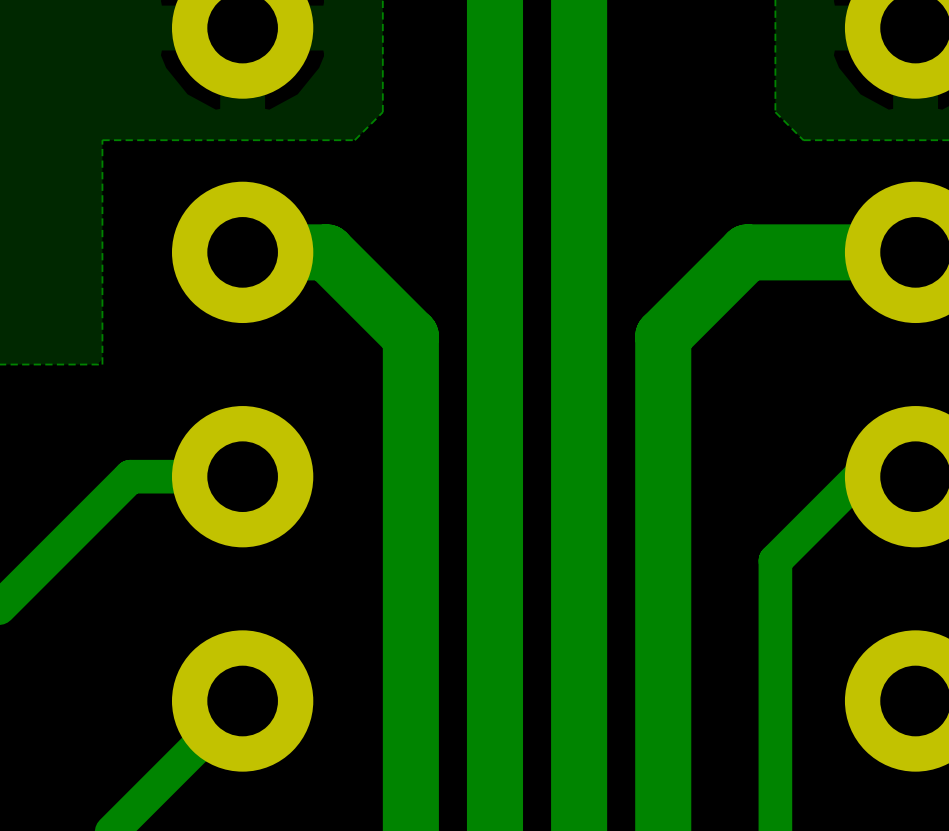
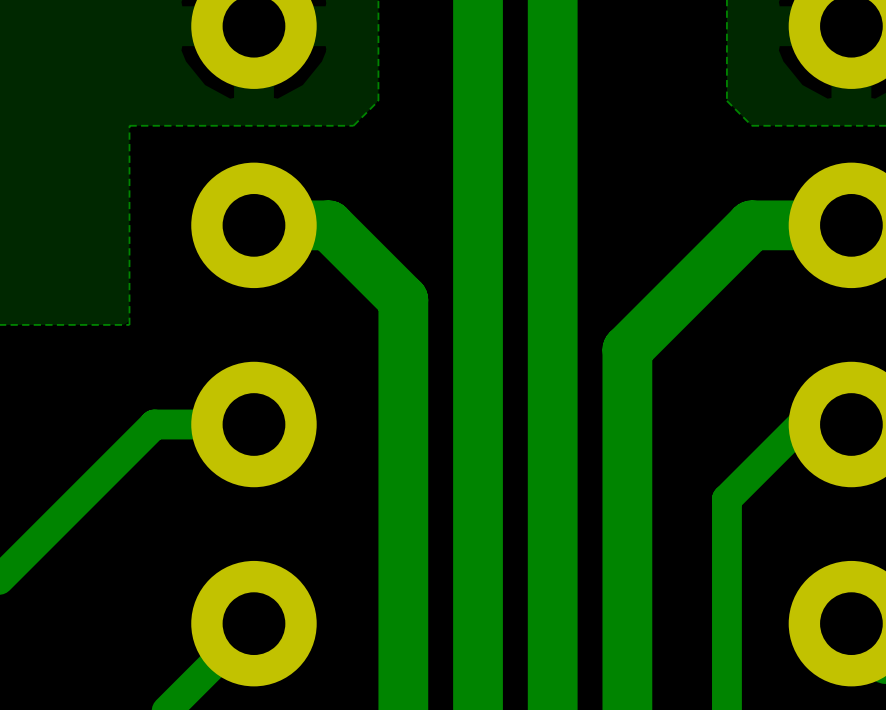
track: (803, 252) (747, 252) (663, 336) (663, 392) -> (751, 225) (627, 349)

